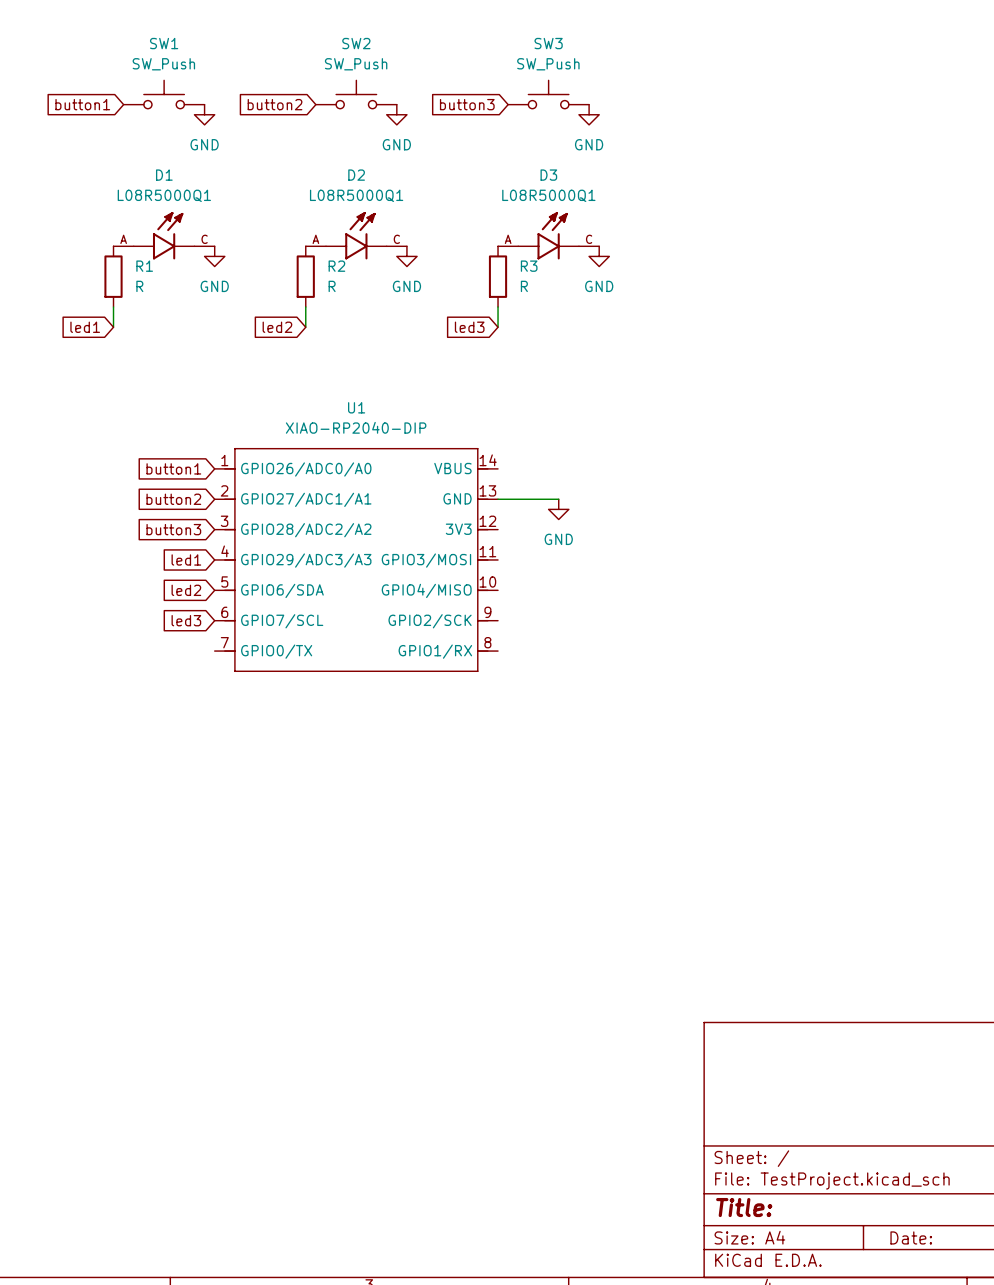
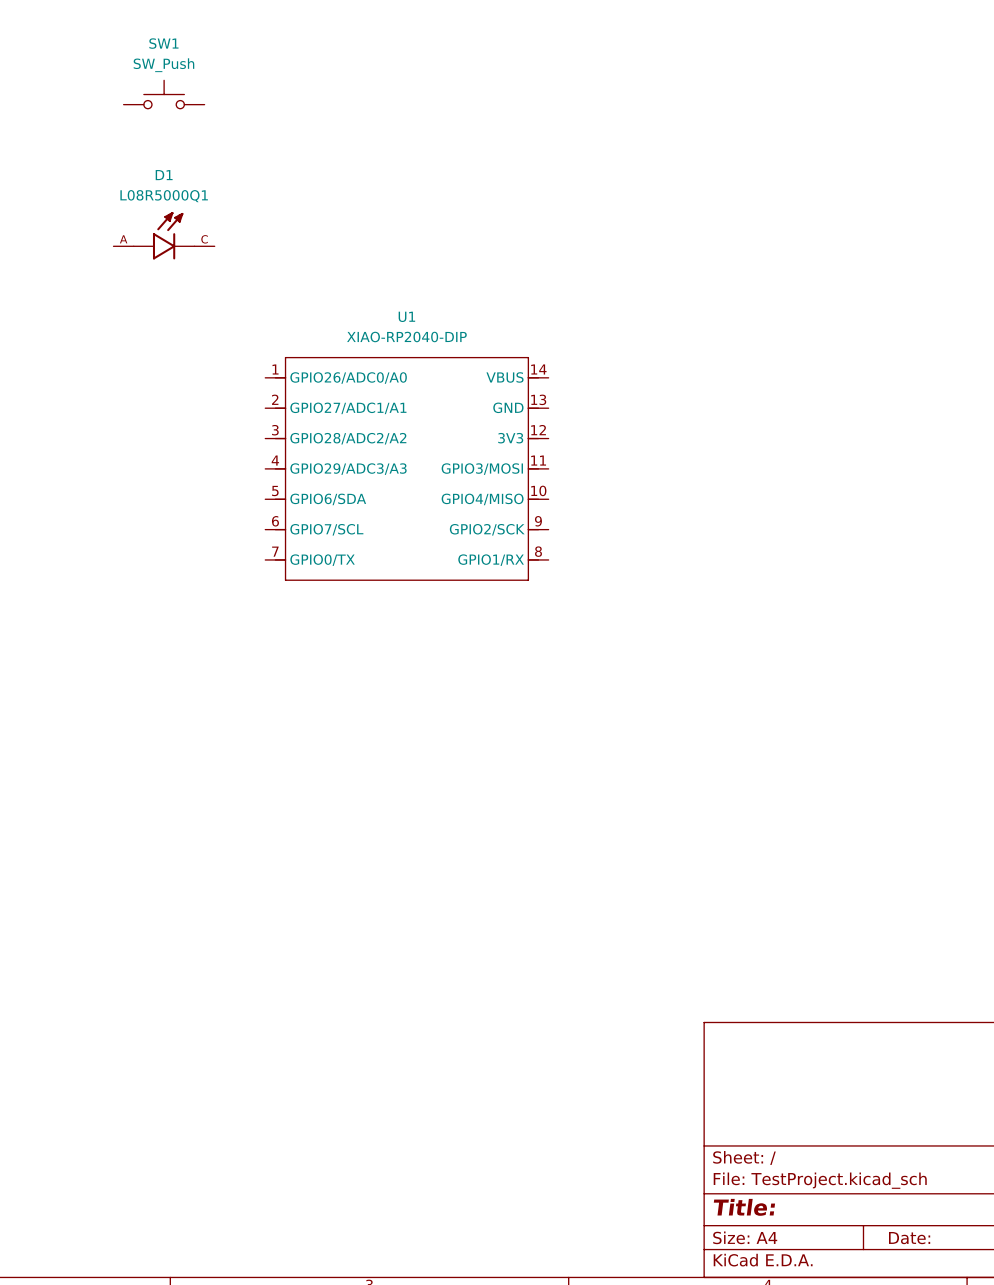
SW2: SW_Push (356, 94) -> none
SW3: SW_Push (548, 94) -> none
global label: button1 (82, 104) -> none
global label: button2 (275, 104) -> none
global label: button3 (467, 104) -> none
power symbol: GND (204, 114) -> none
power symbol: GND (396, 114) -> none
power symbol: GND (589, 114) -> none
D2: L08R5000Q1 (356, 235) -> none
D3: L08R5000Q1 (548, 235) -> none
power symbol: GND (214, 256) -> none
power symbol: GND (406, 256) -> none
power symbol: GND (599, 256) -> none
R1: R (113, 276) -> none
R2: R (305, 276) -> none
R3: R (498, 276) -> none
wire: (113, 307) (113, 327) -> none
wire: (305, 307) (305, 327) -> none
wire: (498, 307) (498, 327) -> none
global label: led1 (85, 327) -> none
global label: led2 (277, 327) -> none
global label: led3 (469, 327) -> none
global label: button1 (173, 468) -> none
global label: button2 (173, 499) -> none
wire: (498, 499) (558, 499) -> none
power symbol: GND (558, 509) -> none
global label: button3 (173, 529) -> none
global label: led1 (186, 559) -> none
U1 position: (356, 559) -> (406, 468)
global label: led2 (186, 590) -> none
global label: led3 (186, 620) -> none

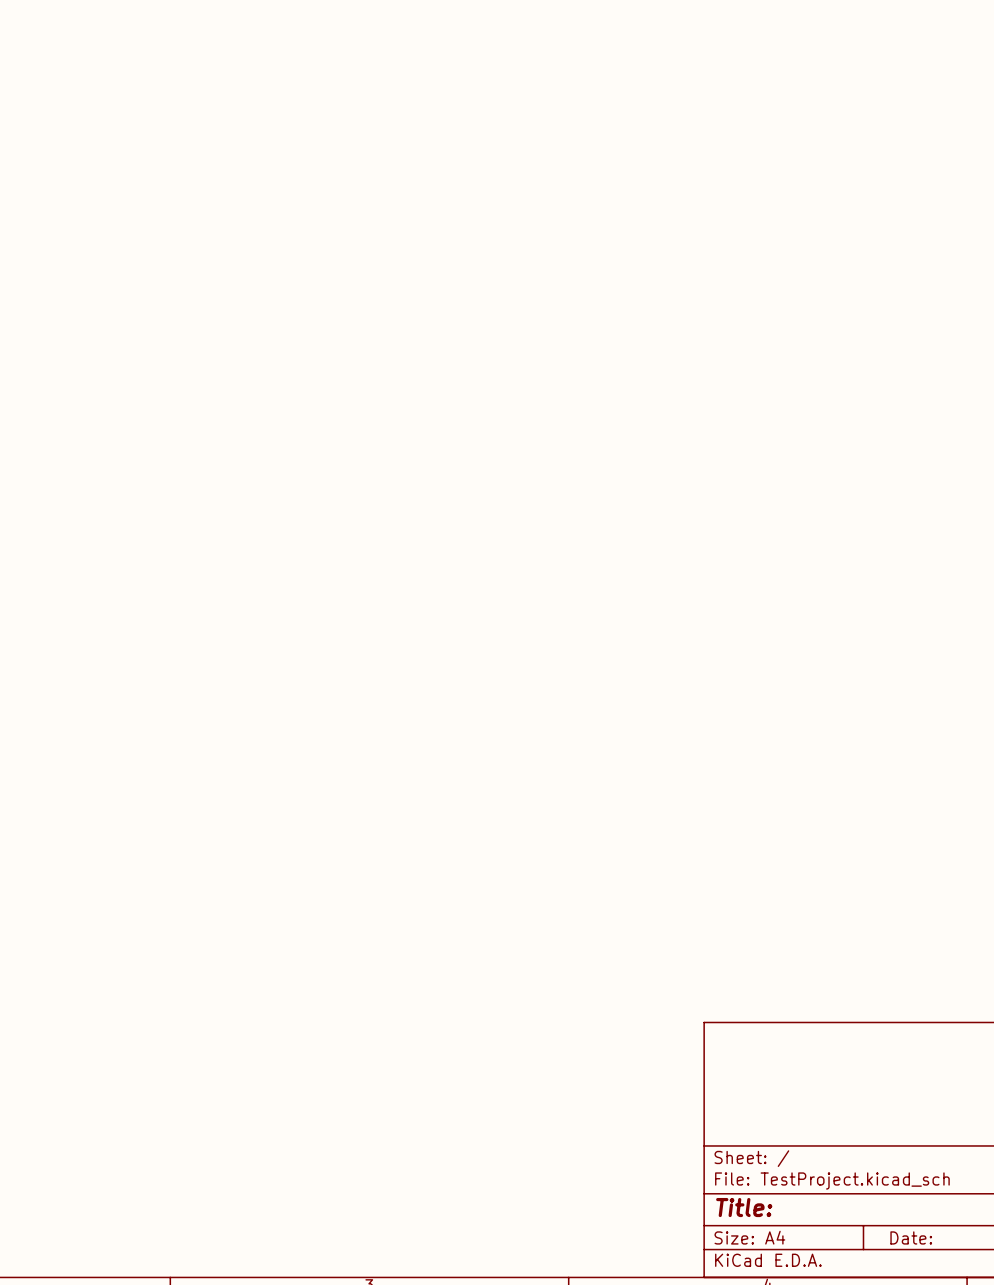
SW1: SW_Push (164, 94) -> none
D1: L08R5000Q1 (164, 235) -> none
U1: XIAO-RP2040-DIP (406, 468) -> none

